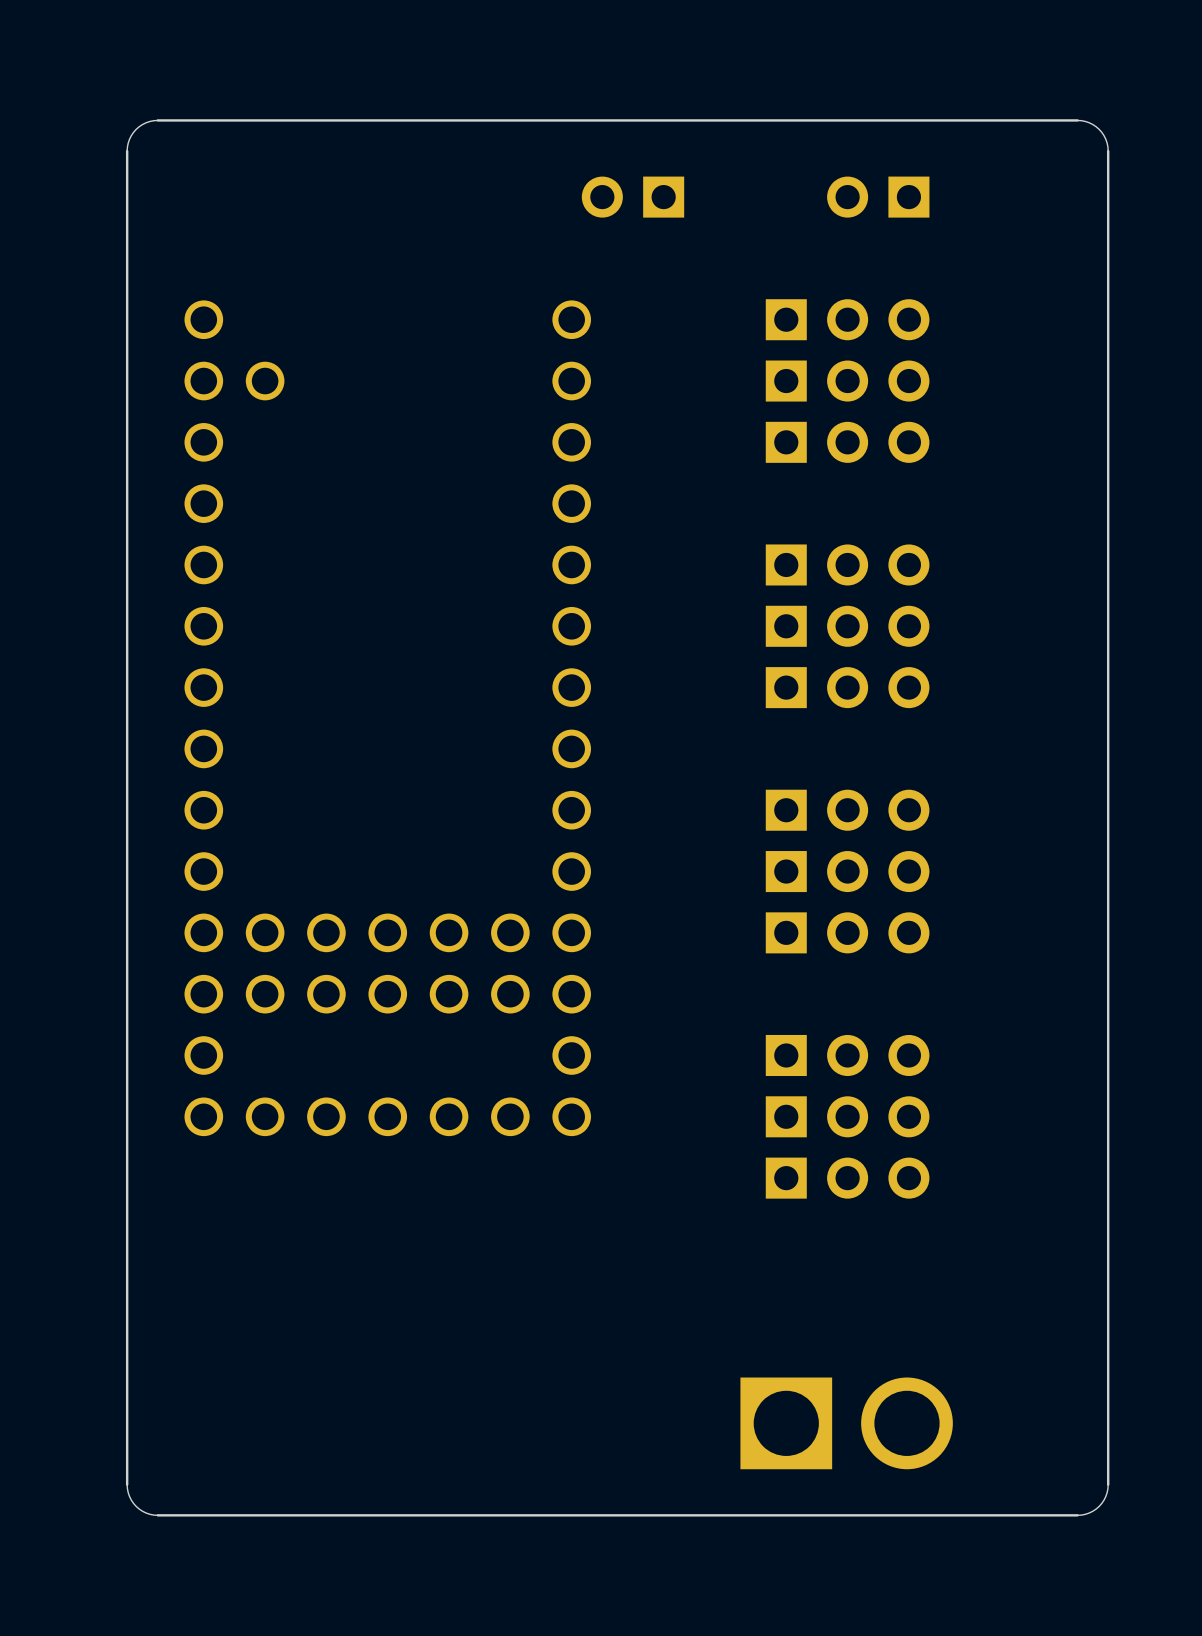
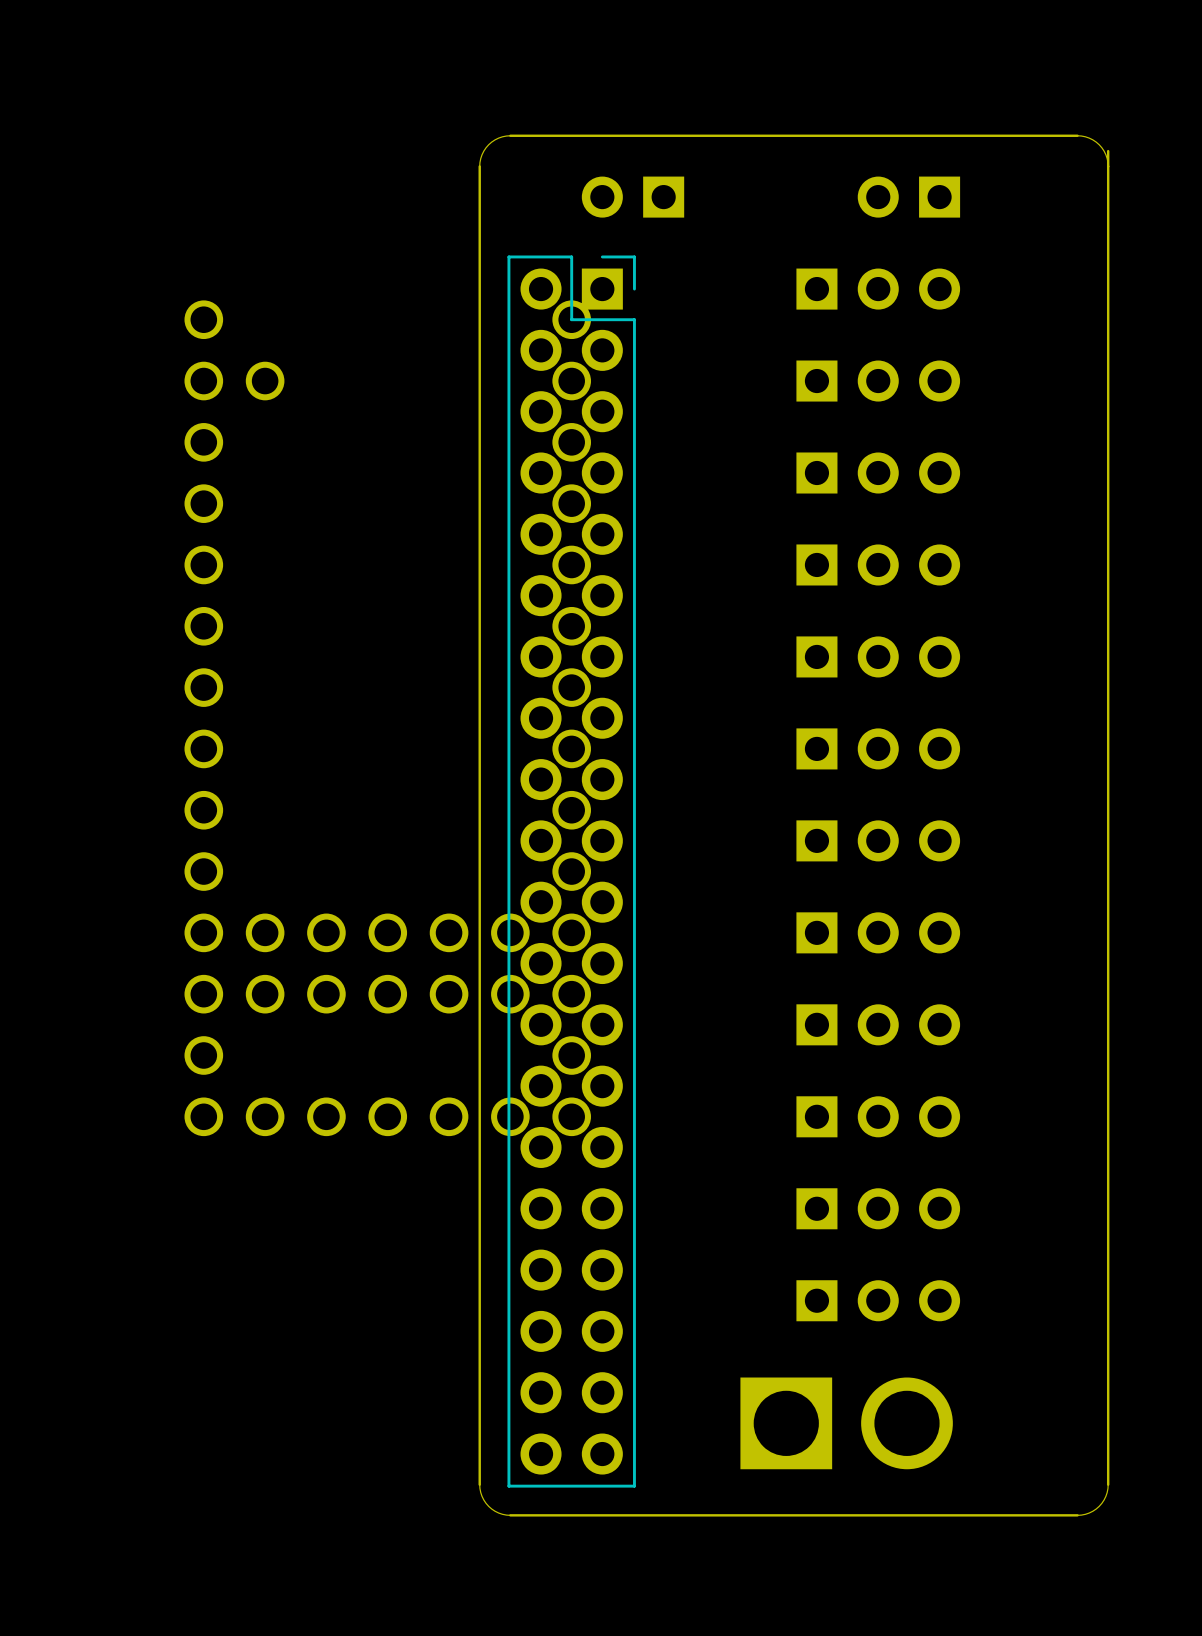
board edge: (157, 120) (146, 122) (136, 129) (129, 139) (127, 151) (128, 1492) (133, 1503) (139, 1509) (146, 1513) (157, 1515) (510, 1515) -> (1108, 166) (1105, 154) (1099, 144) (1089, 138) (1077, 135) (510, 135) (495, 139) (488, 144) (482, 154) (479, 166) (479, 1484) (482, 1496) (488, 1506) (498, 1513) (510, 1515)
board edge: (157, 120) (1077, 120) (1089, 122) (1099, 129) (1105, 139) (1108, 151) -> none
part position: (878, 197) -> (908, 197)
part: none -> (878, 289)
part: (847, 319) -> none
part position: (847, 381) -> (878, 381)
part: (847, 442) -> none
part: none -> (878, 473)
part position: (847, 564) -> (878, 564)
part: (847, 626) -> none
part: none -> (878, 656)
part: (847, 687) -> none
part: none -> (878, 748)
part: (847, 810) -> none
part: none -> (878, 840)
part: none -> (571, 871)
part: (847, 871) -> none
part position: (847, 932) -> (878, 932)
part: none -> (878, 1024)
part: (847, 1055) -> none
part position: (847, 1116) -> (878, 1116)
part: (847, 1178) -> none
part: none -> (878, 1208)
part: none -> (878, 1300)

